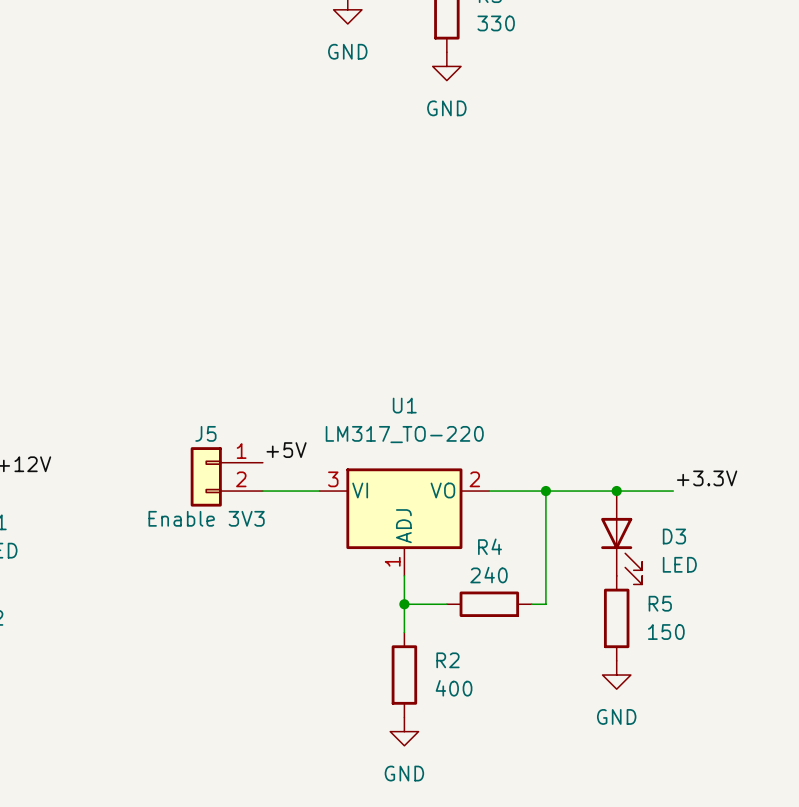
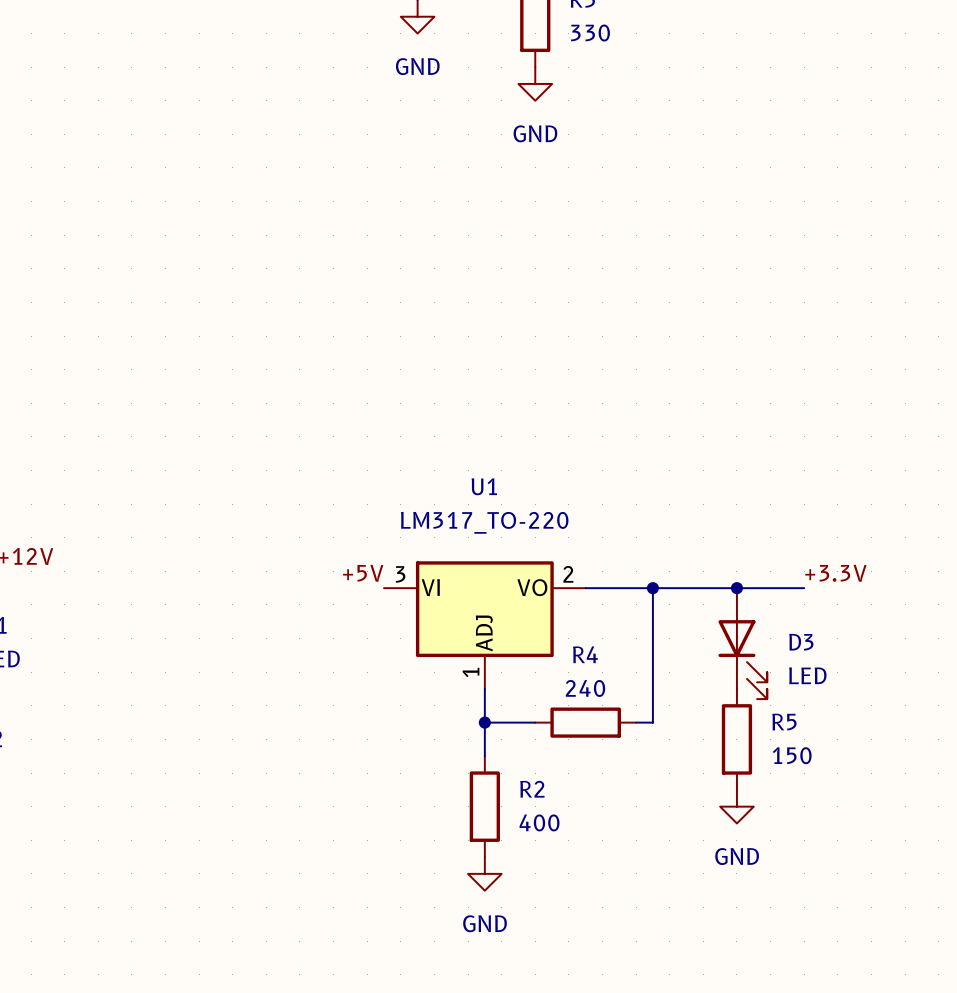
label position: +5V (286, 450) -> +5V (363, 573)
J5: Enable 3V3 (226, 476) -> none
wire: (262, 491) (319, 491) -> none

